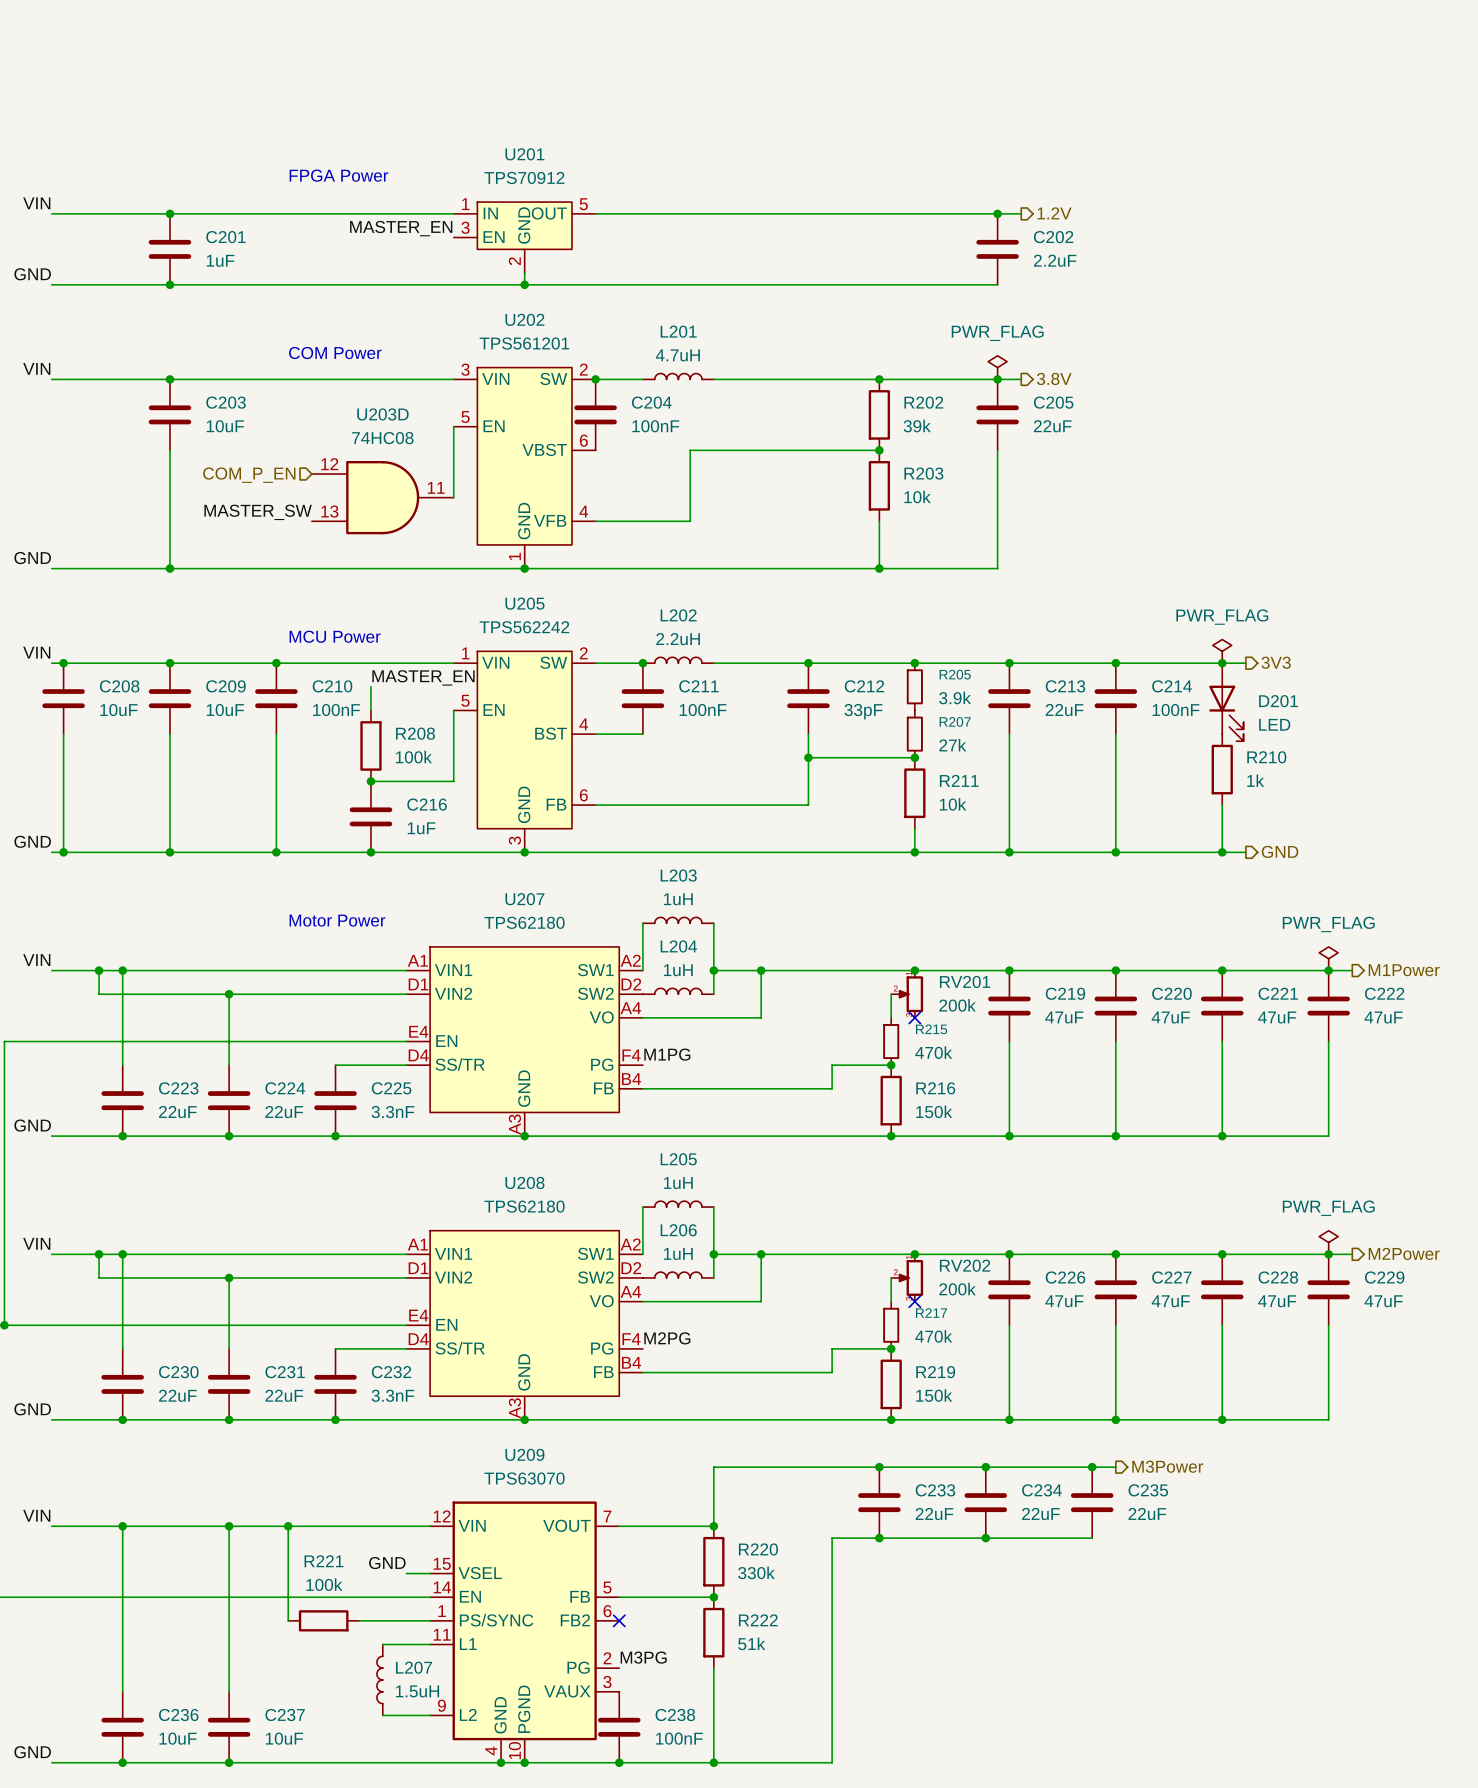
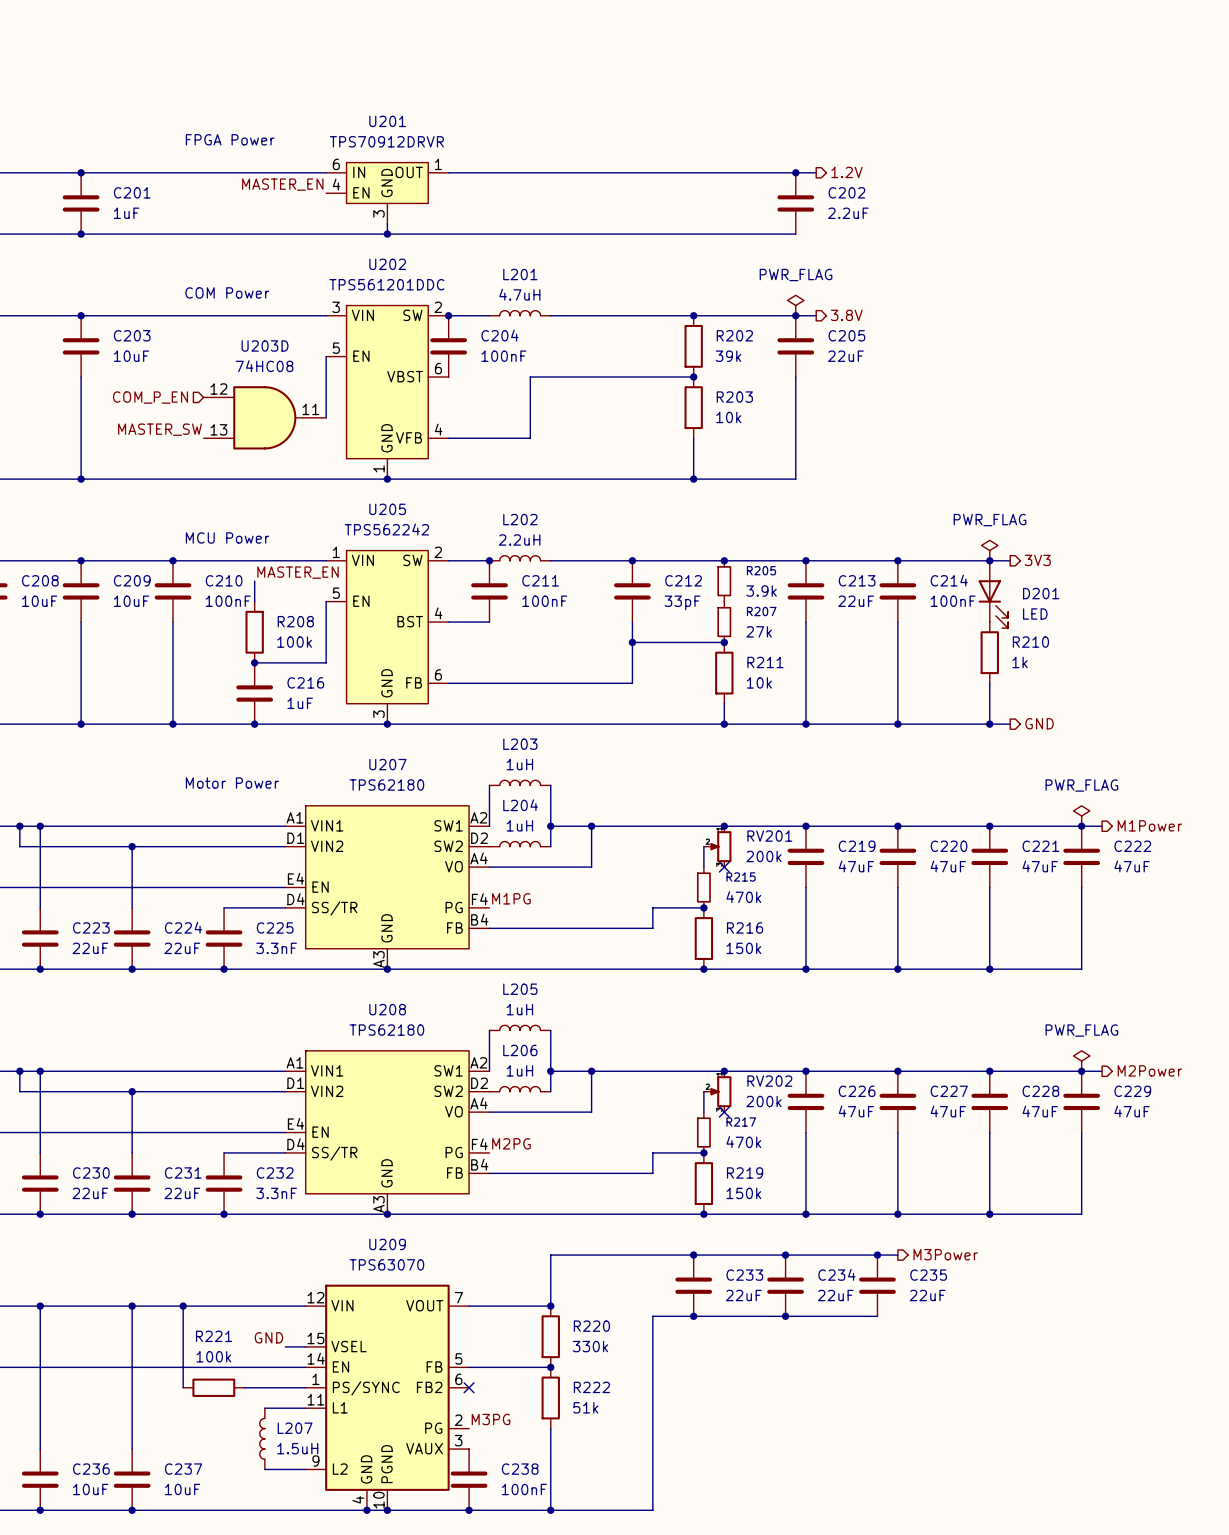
U201 value: TPS70912 (524, 177) -> TPS70912DRVR (386, 141)
U201 pin number: 1 (465, 204) -> 6 (336, 164)
U201 pin number: 5 (583, 204) -> 1 (438, 164)
U201 pin number: 3 (465, 227) -> 4 (336, 184)
U201 pin number: 2 (514, 261) -> 3 (378, 213)
U202 value: TPS561201 (524, 343) -> TPS561201DDC (386, 284)

